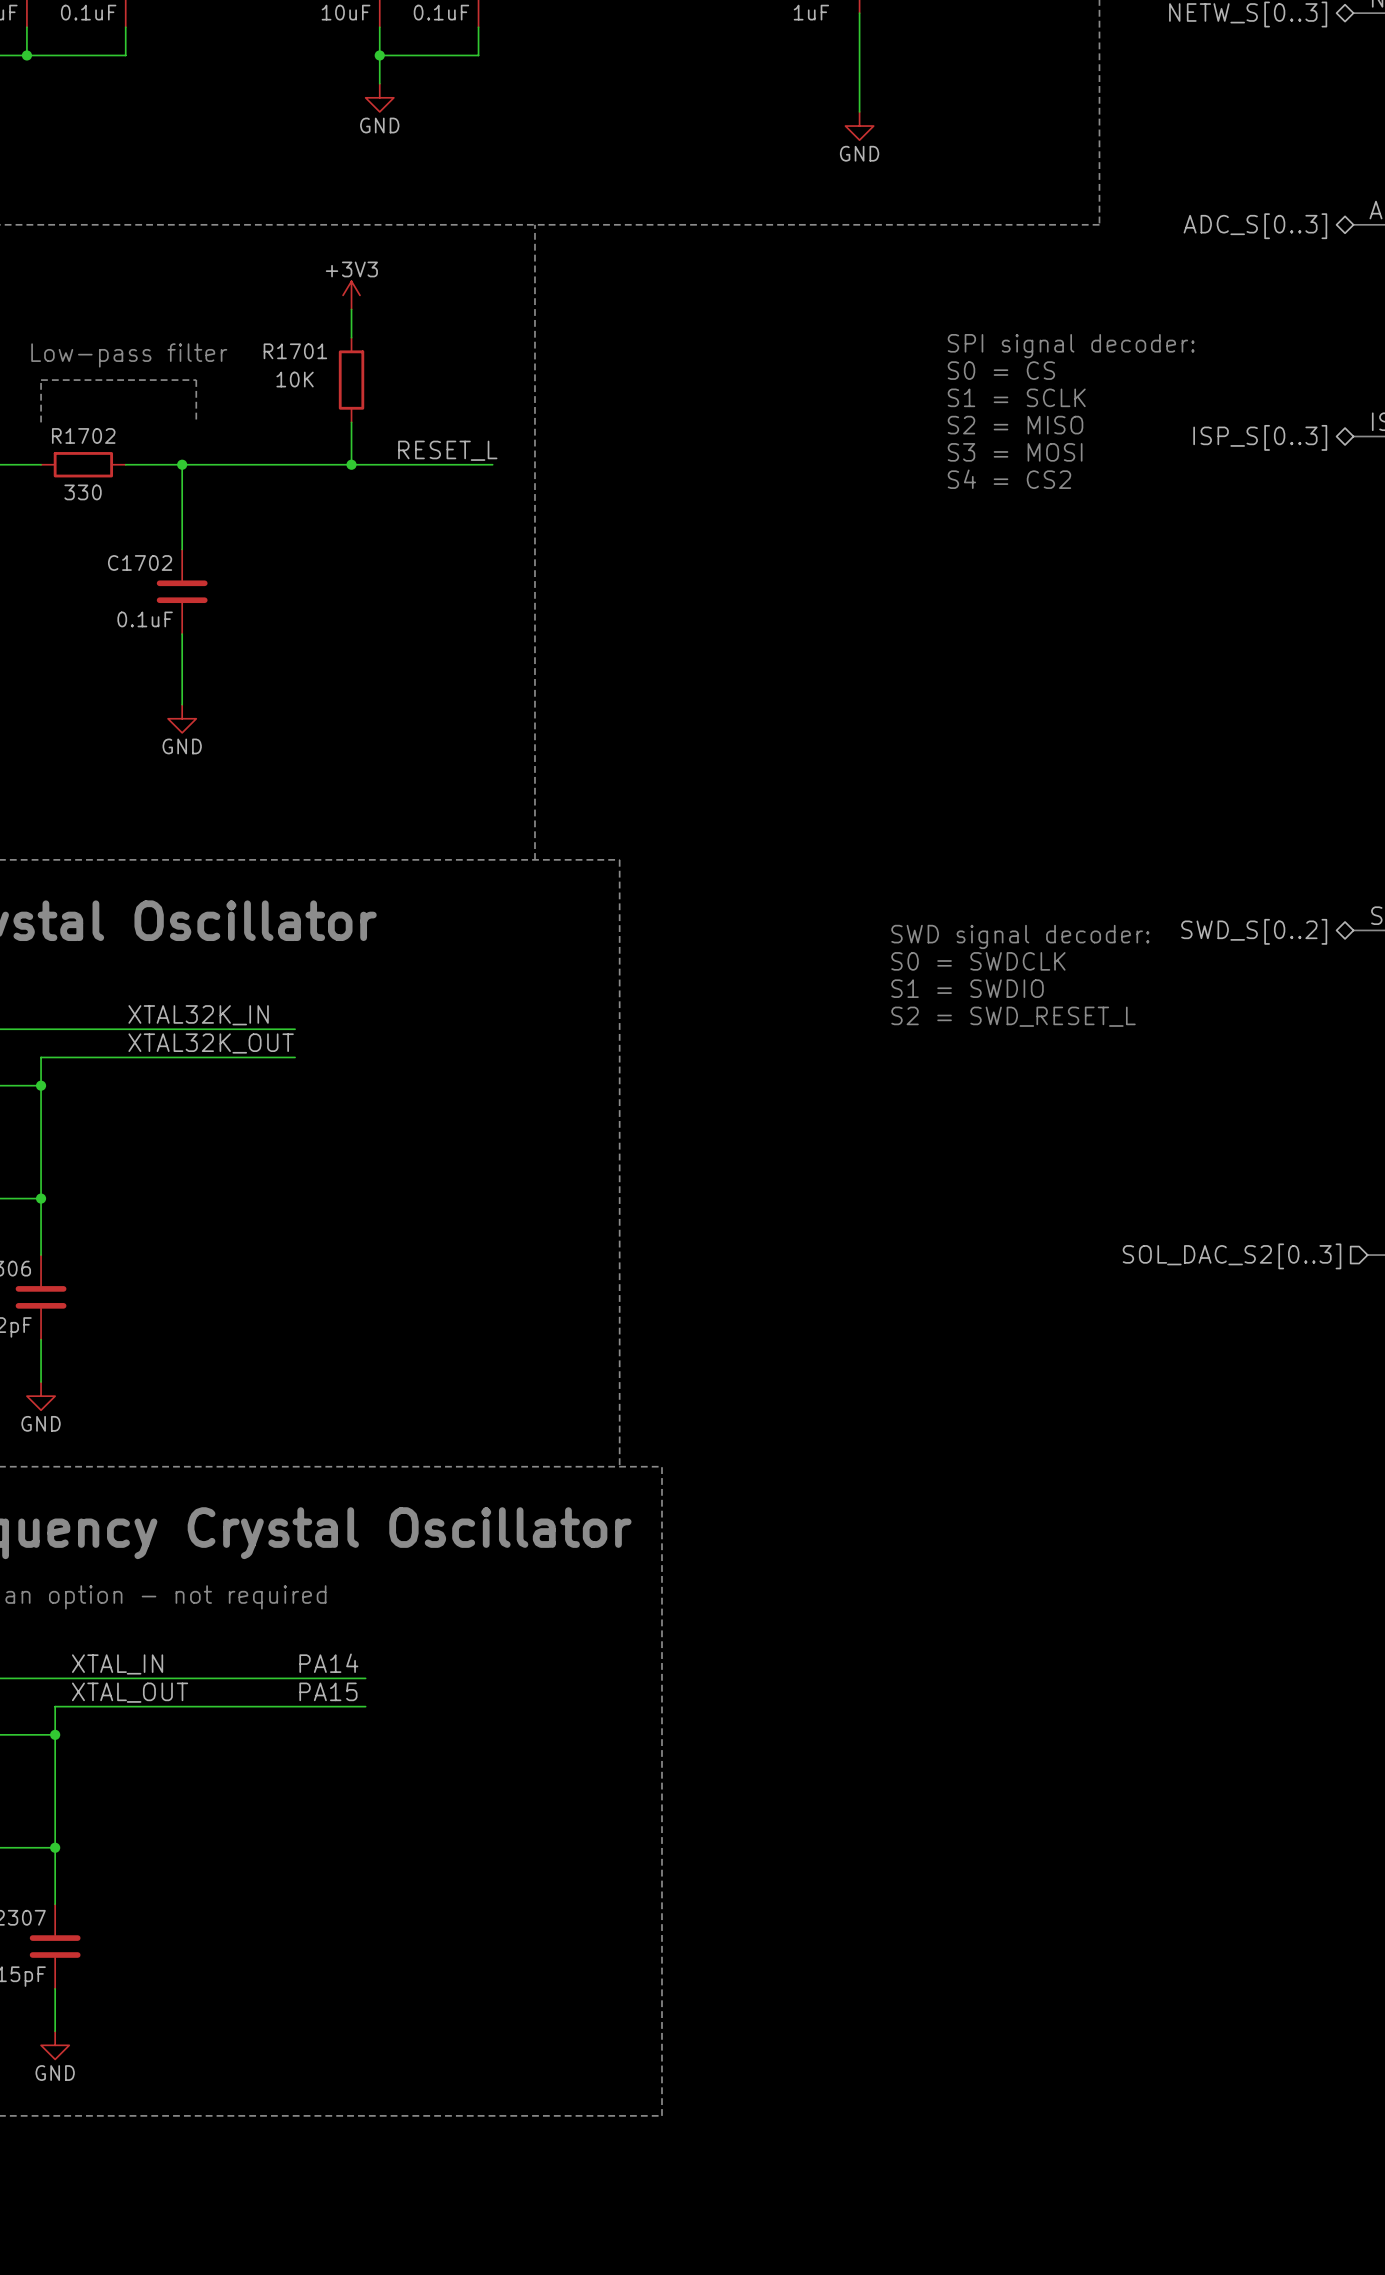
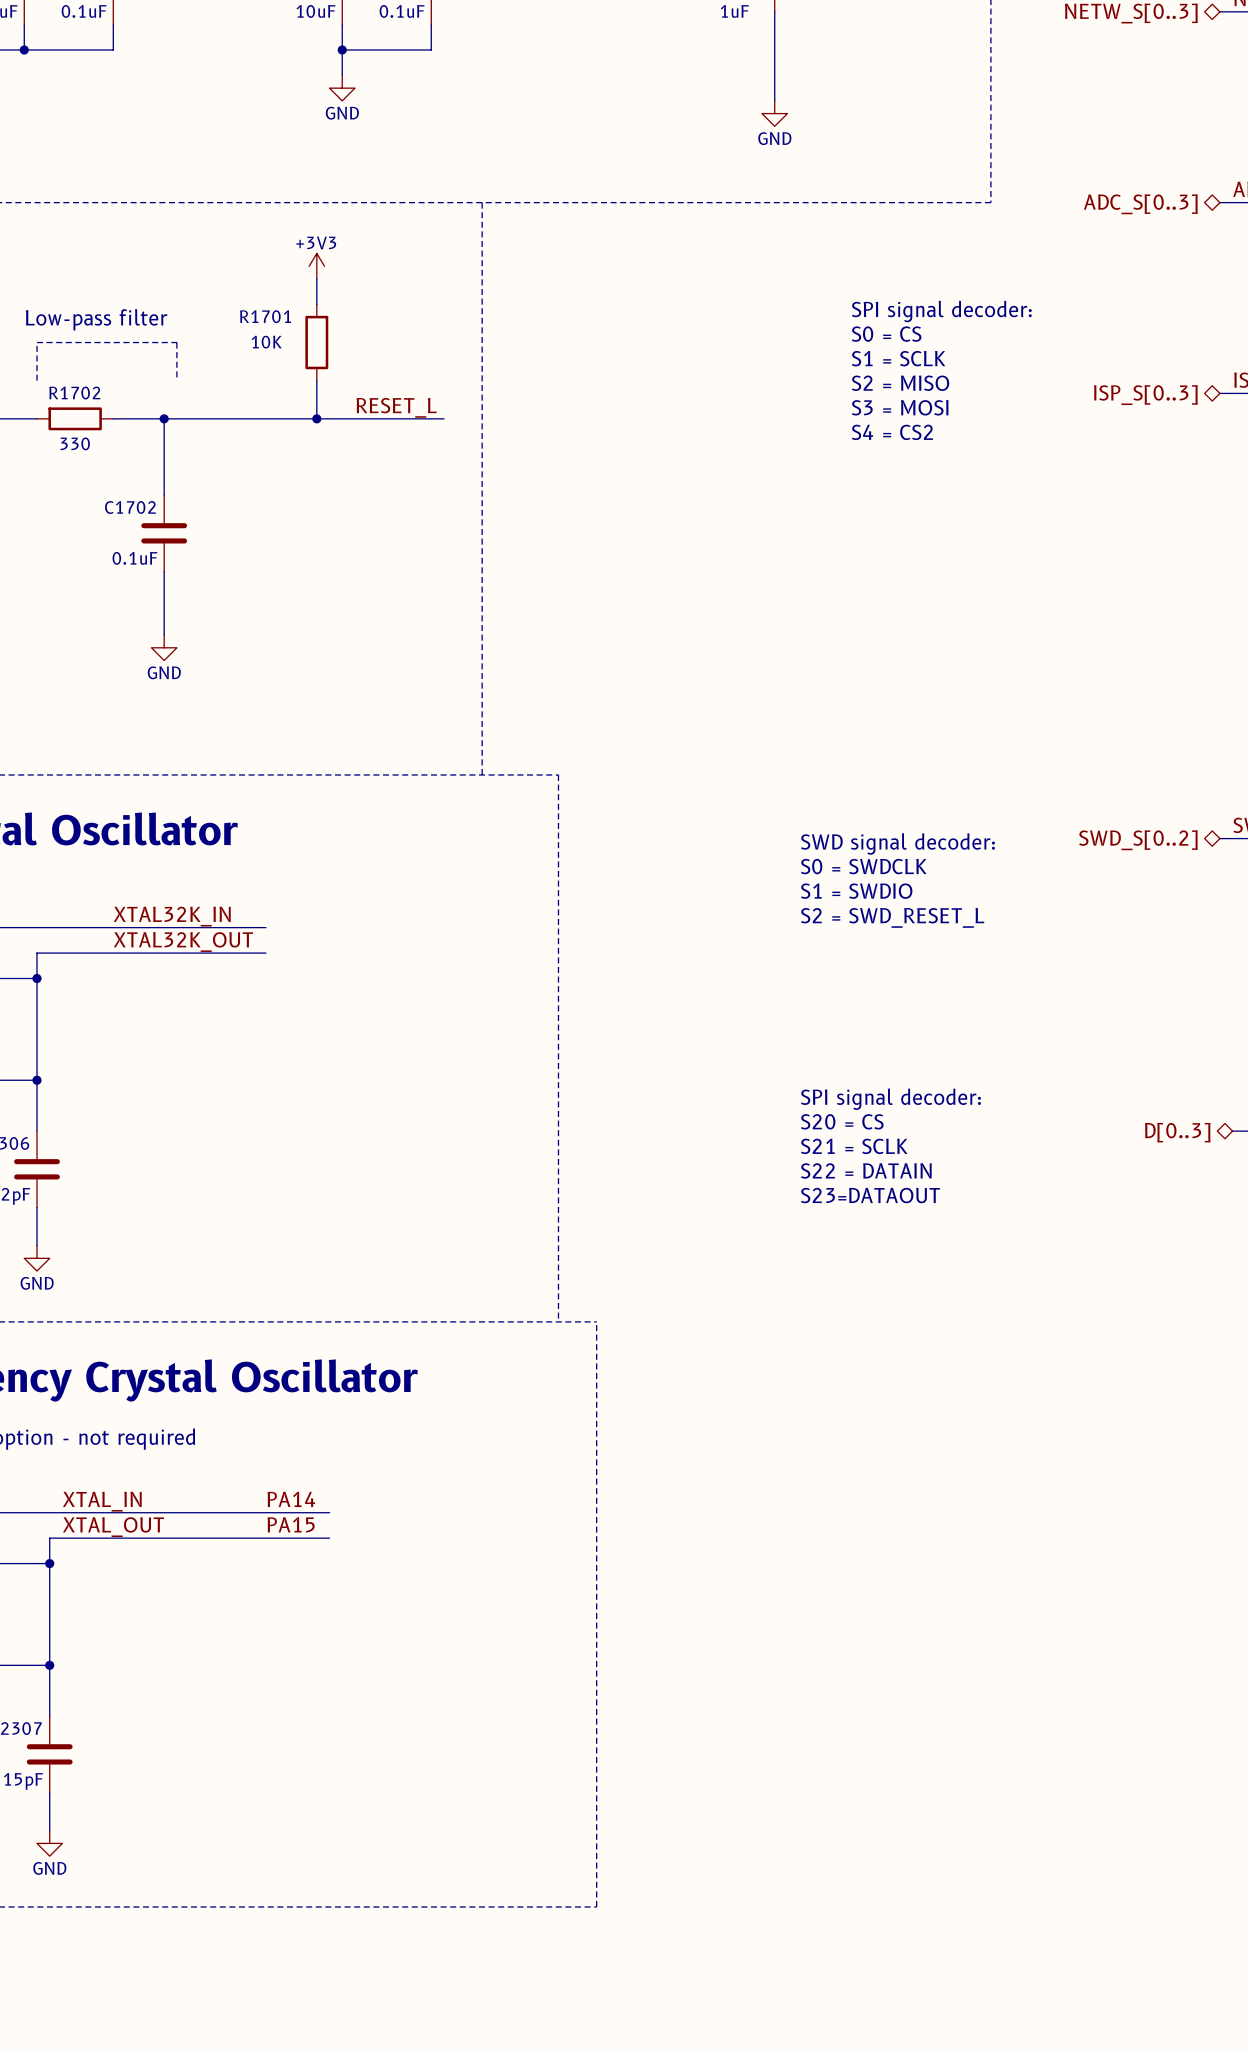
text: none -> SPI signal decoder: (890, 1099)
text: none -> S20 = CS (842, 1121)
hierarchical label shape: input (1232, 1256) -> bidirectional (1177, 1132)
hierarchical label: SOL_DAC_S2[0..3] (1232, 1256) -> D[0..3] (1177, 1132)
text: none -> S21 = SCLK (854, 1146)
text: none -> S22 = DATAIN (866, 1170)
text: none -> S23=DATAOUT (870, 1195)

